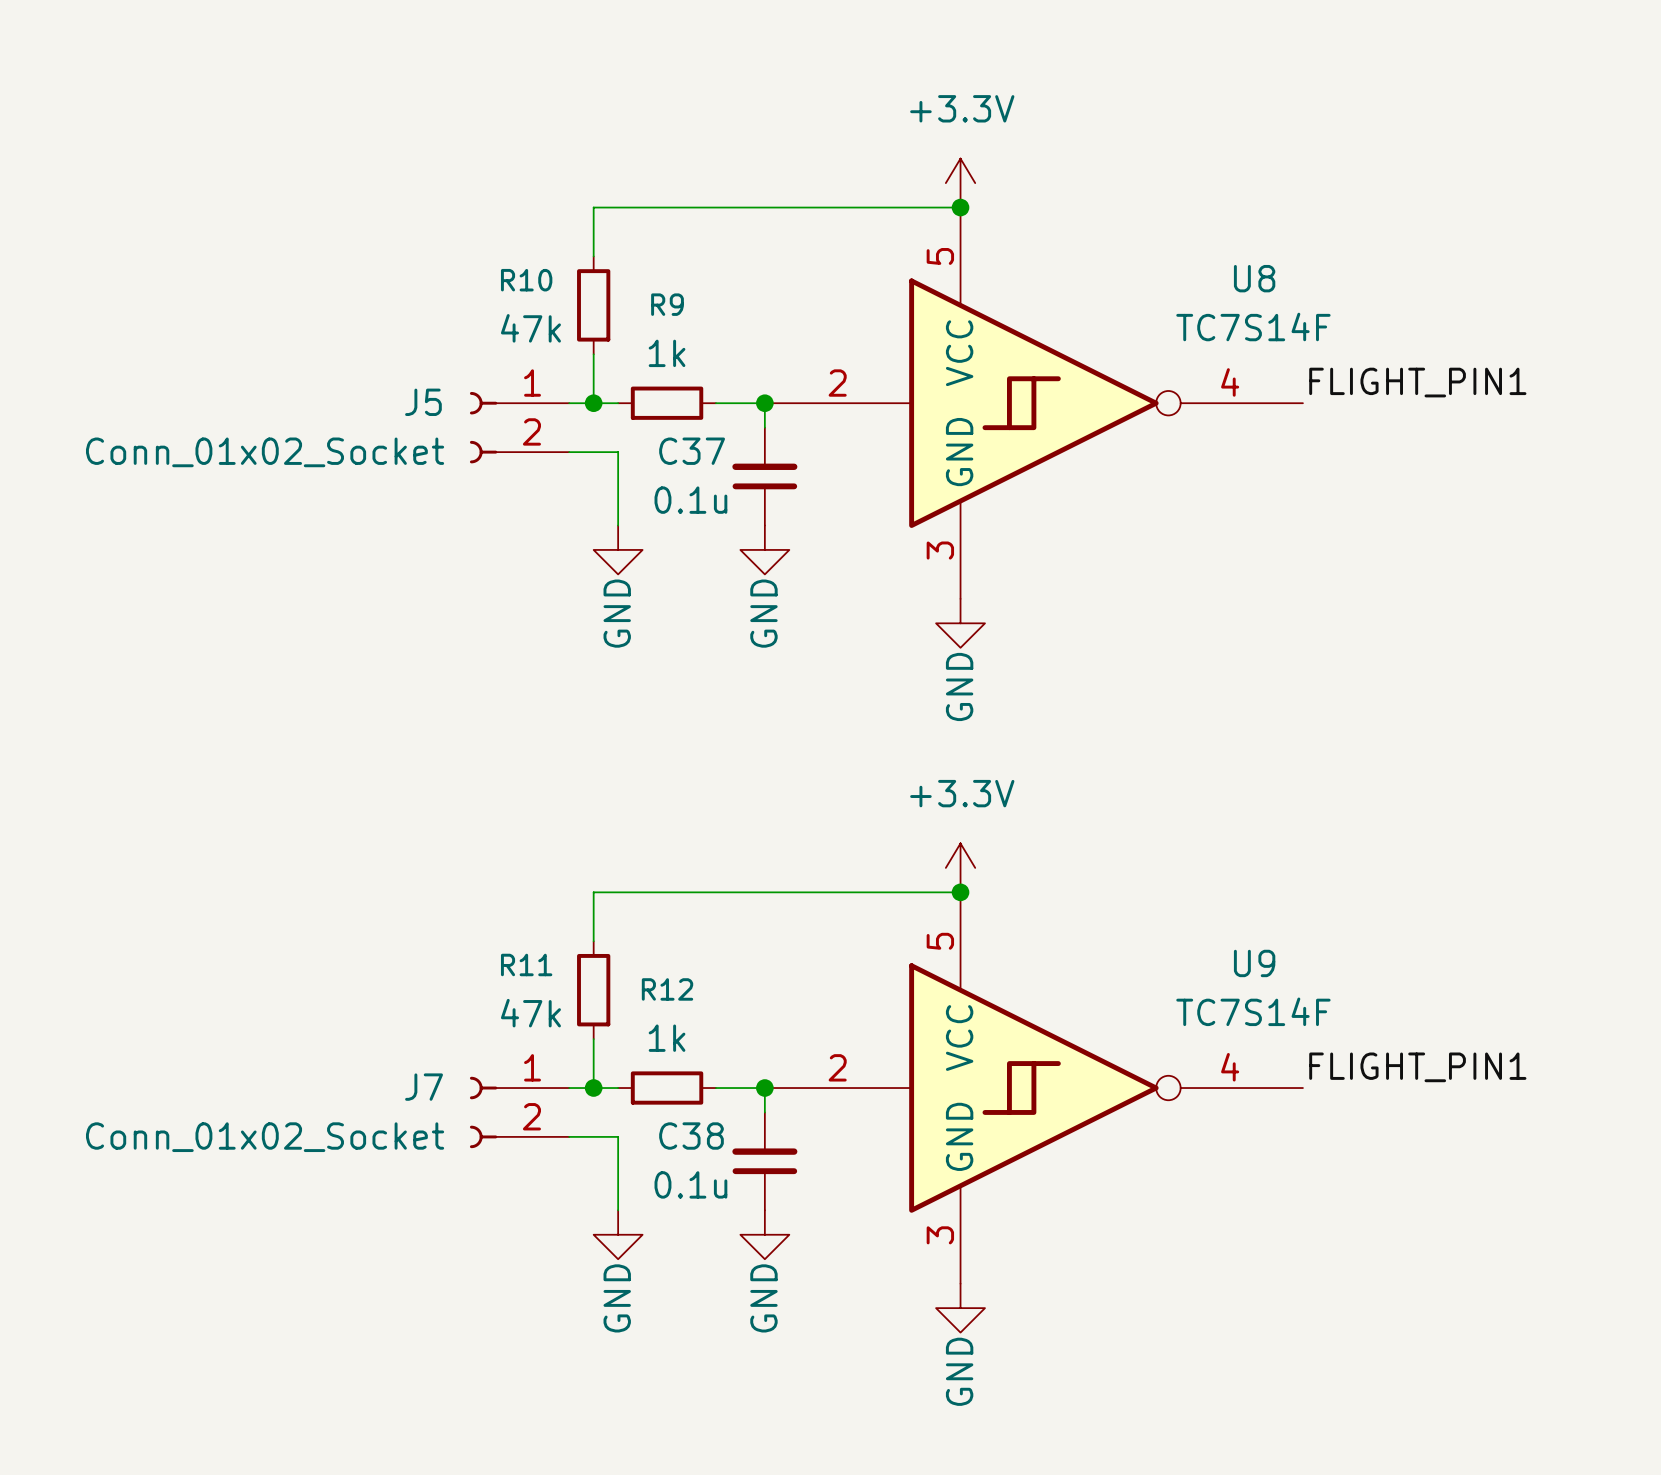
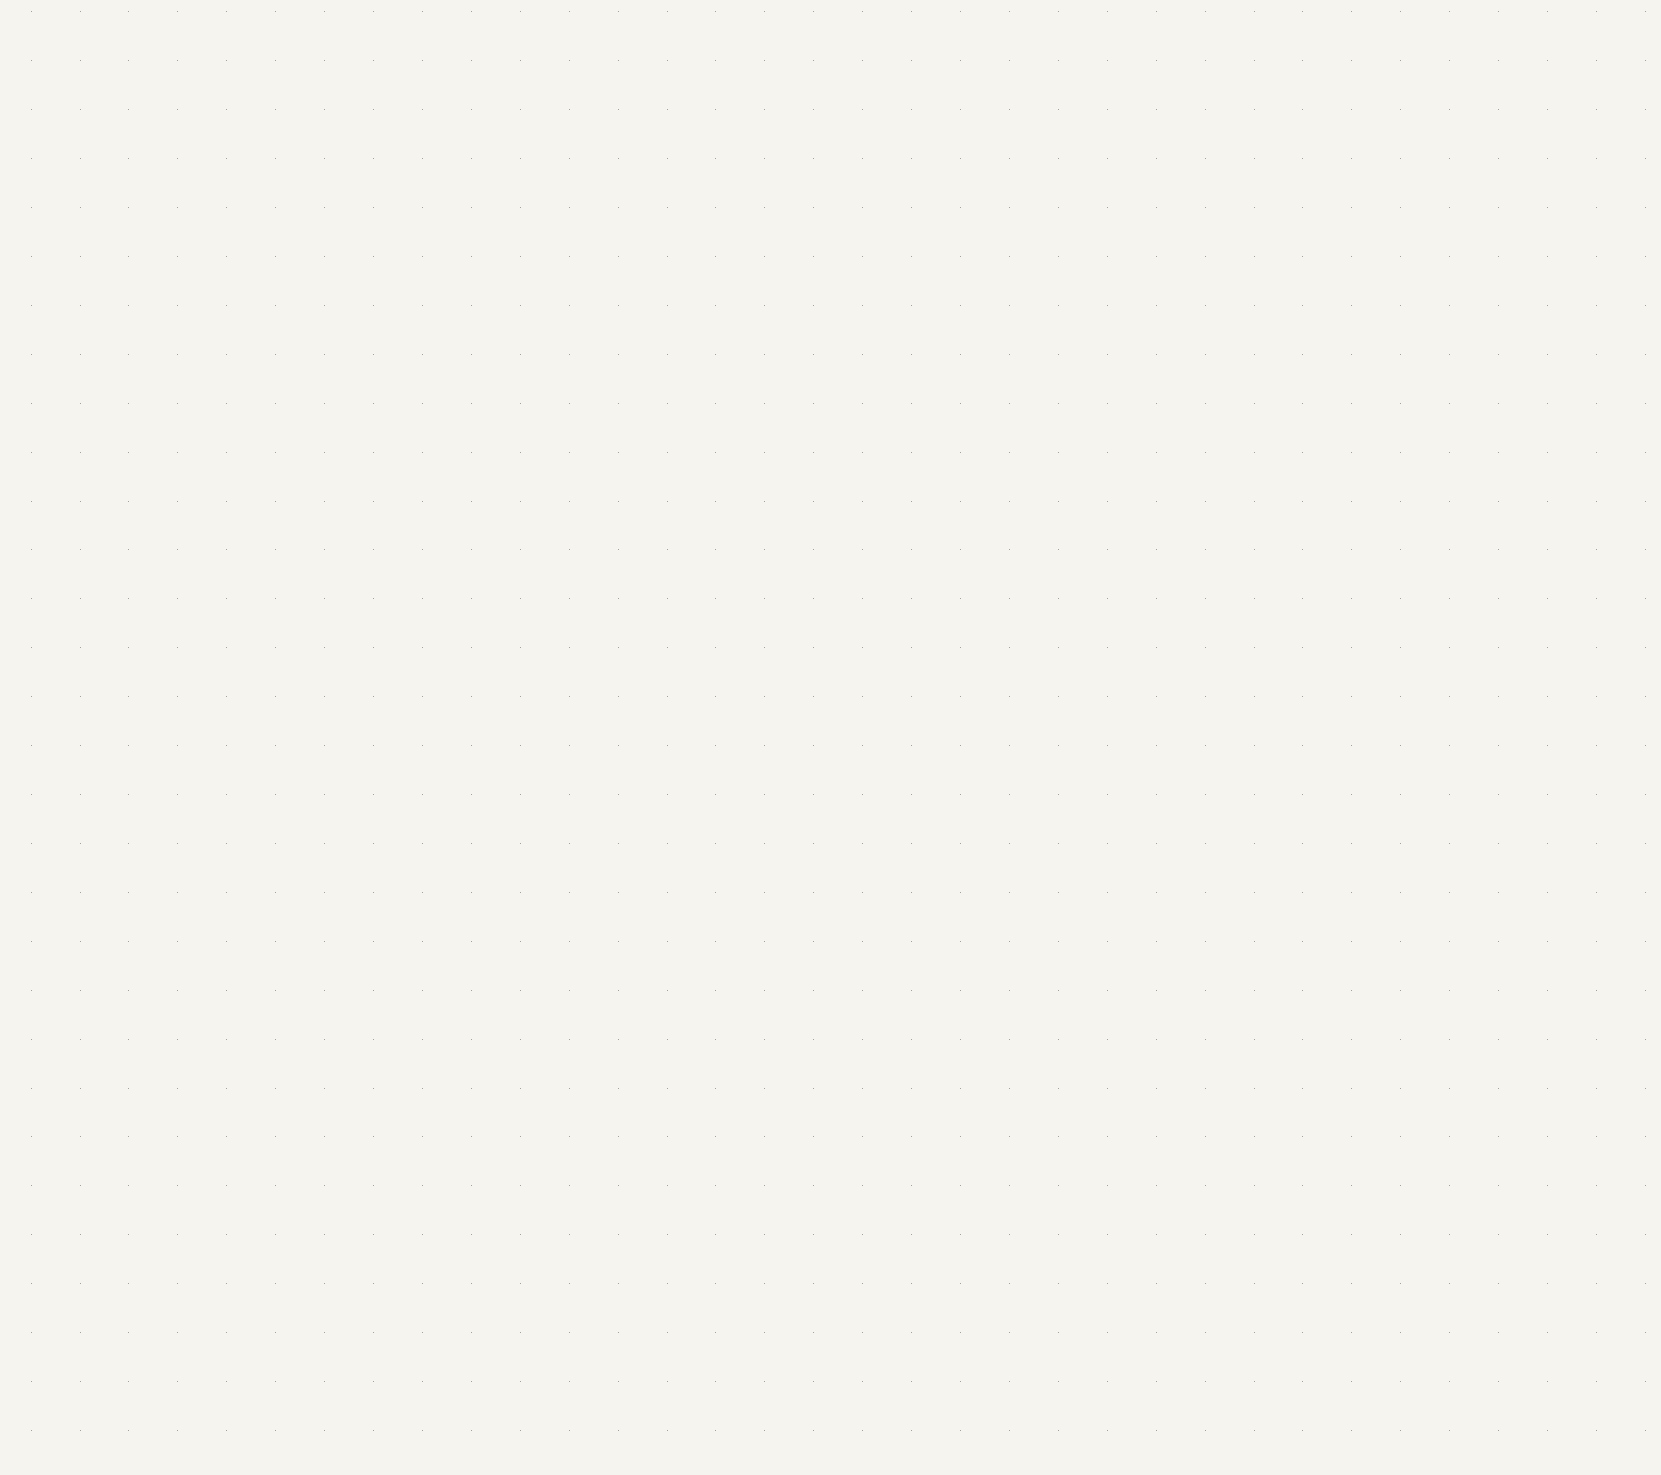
power symbol: +3.3V (960, 183) -> none
wire: (960, 207) (593, 207) (593, 256) -> none
junction: (960, 207) -> none
R10: 47k (593, 305) -> none
wire: (593, 354) (593, 403) -> none
label: FLIGHT_PIN1 (1417, 382) -> none
wire: (569, 403) (618, 403) -> none
junction: (593, 403) -> none
R9: 1k (667, 403) -> none
wire: (715, 403) (764, 403) (764, 427) -> none
junction: (764, 403) -> none
U8: TC7S14F (1033, 403) -> none
J5: Conn_01x02_Socket (519, 427) -> none
wire: (569, 452) (618, 452) (618, 525) -> none
C37: 0.1u (764, 476) -> none
power symbol: GND (618, 549) -> none
power symbol: GND (764, 549) -> none
power symbol: GND (960, 623) -> none
power symbol: +3.3V (960, 867) -> none
wire: (960, 892) (593, 892) (593, 941) -> none
junction: (960, 892) -> none
R11: 47k (593, 990) -> none
wire: (593, 1039) (593, 1088) -> none
label: FLIGHT_PIN1 (1417, 1067) -> none
wire: (569, 1088) (618, 1088) -> none
junction: (593, 1088) -> none
R12: 1k (667, 1088) -> none
wire: (715, 1088) (764, 1088) (764, 1112) -> none
junction: (764, 1088) -> none
U9: TC7S14F (1033, 1088) -> none
J7: Conn_01x02_Socket (519, 1112) -> none
wire: (569, 1136) (618, 1136) (618, 1210) -> none
C38: 0.1u (764, 1161) -> none
power symbol: GND (618, 1234) -> none
power symbol: GND (764, 1234) -> none
power symbol: GND (960, 1308) -> none

